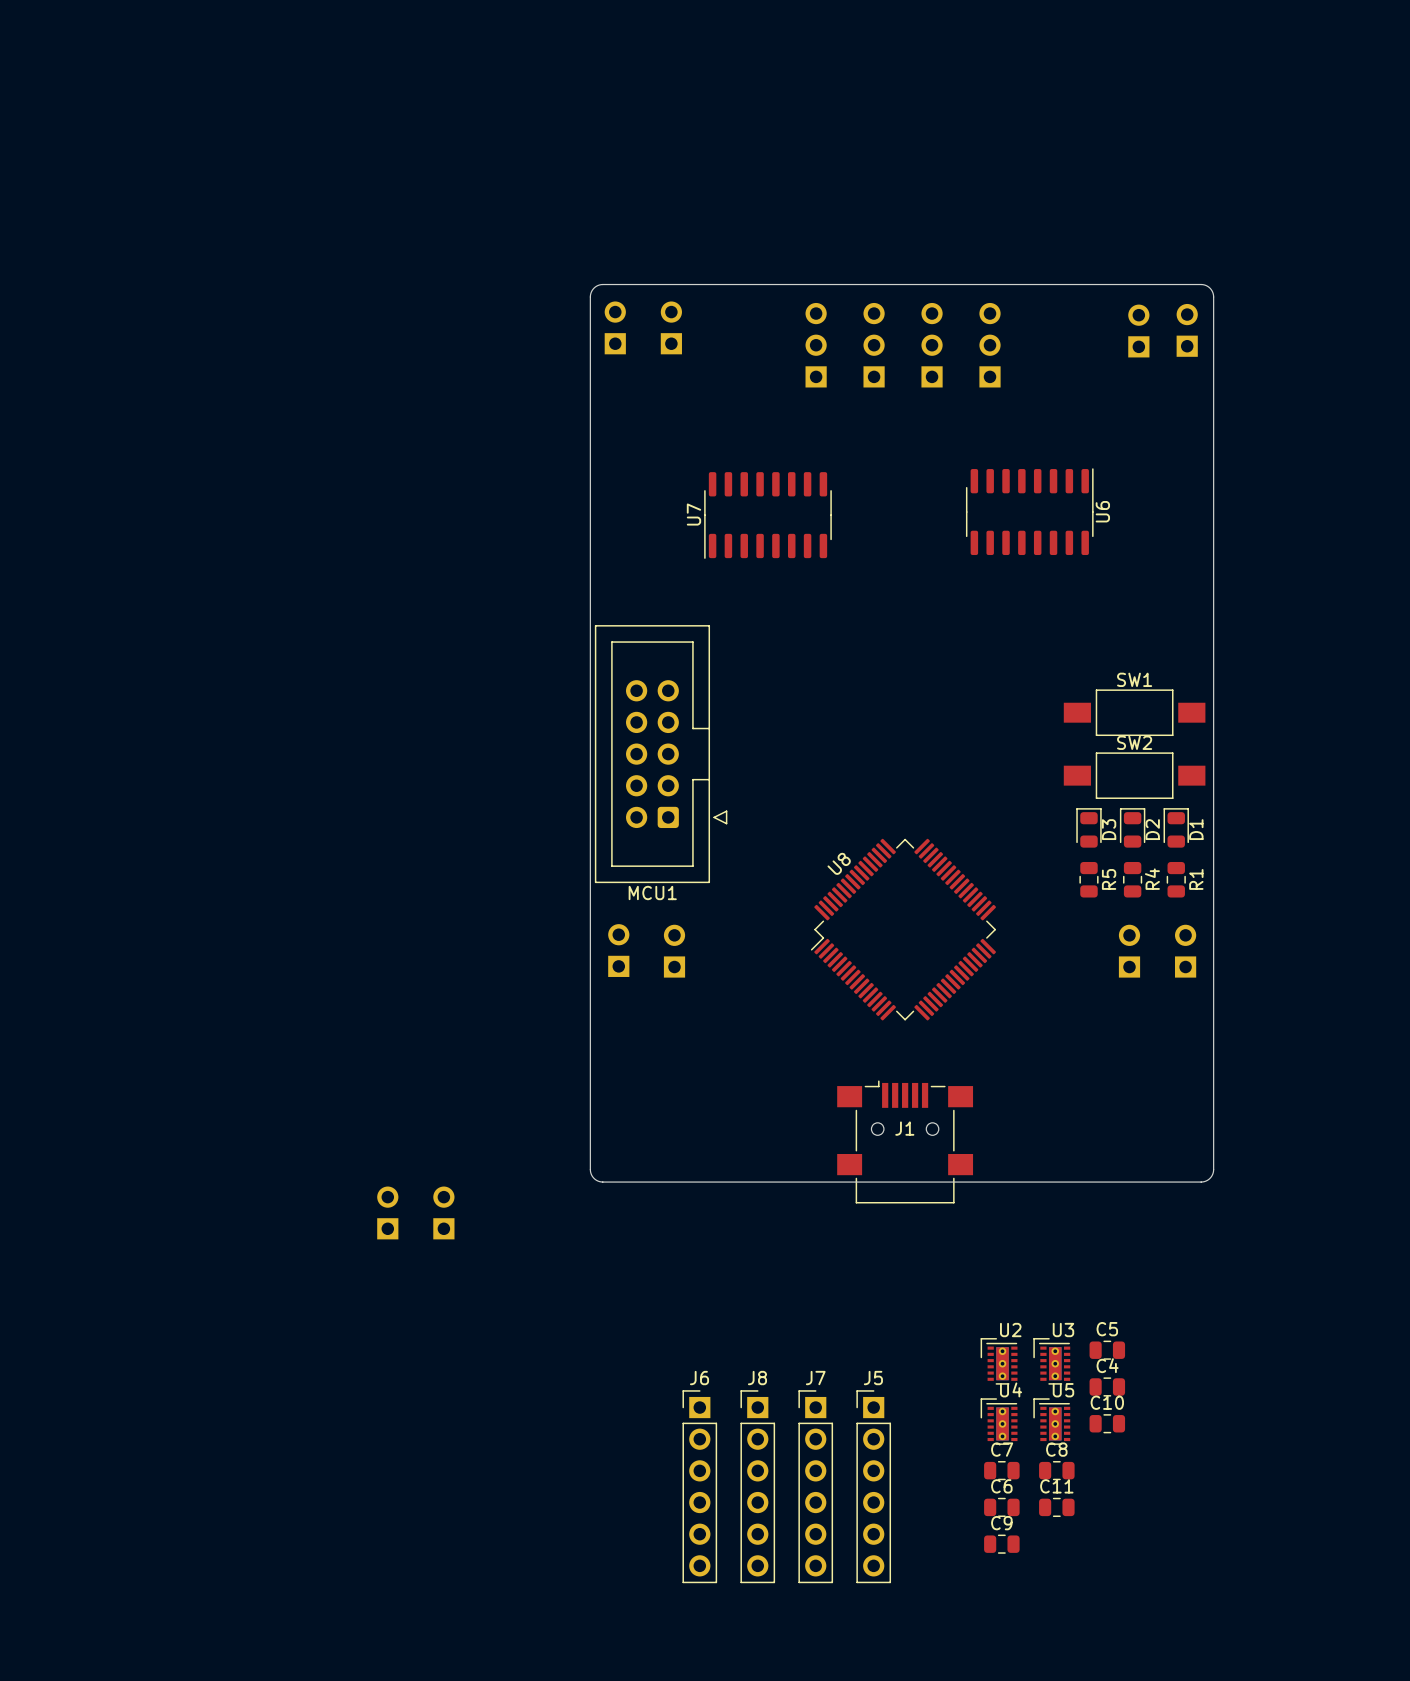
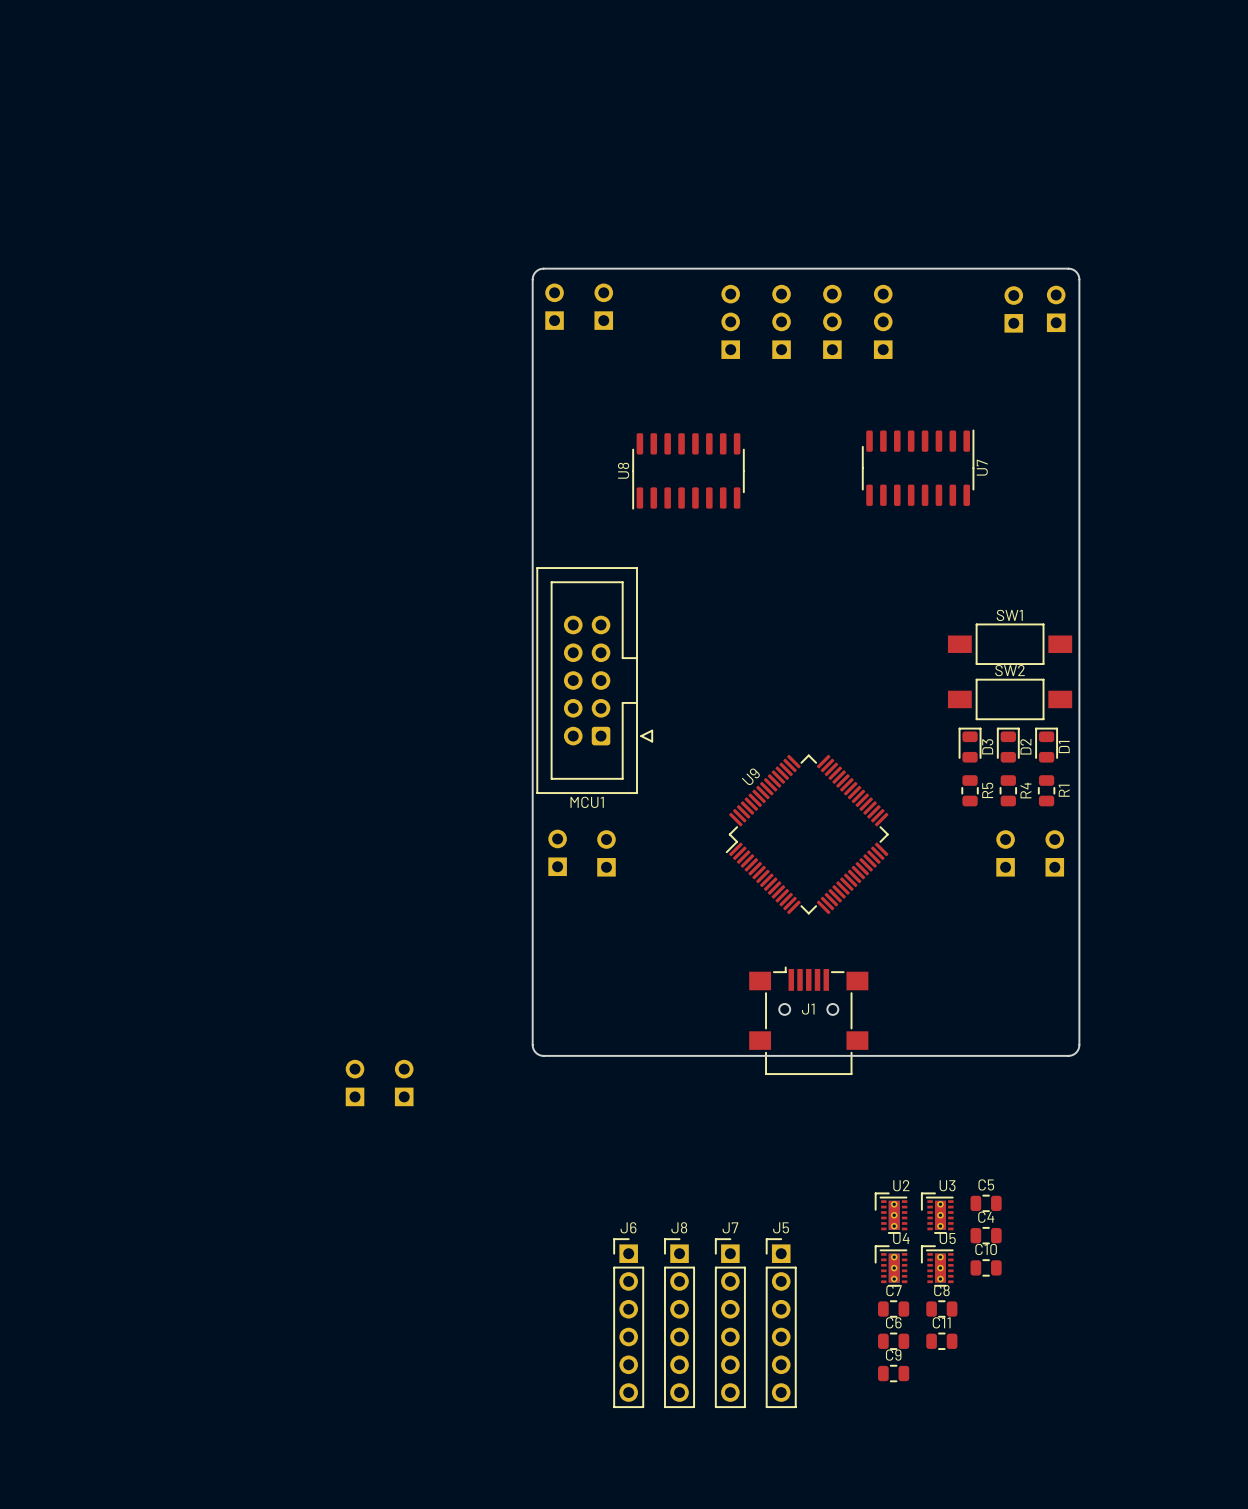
U6 name: U6 (1102, 511) -> U7 (982, 467)
U7 name: U7 (693, 514) -> U8 (623, 470)
U8 name: U8 (839, 863) -> U9 (750, 776)

